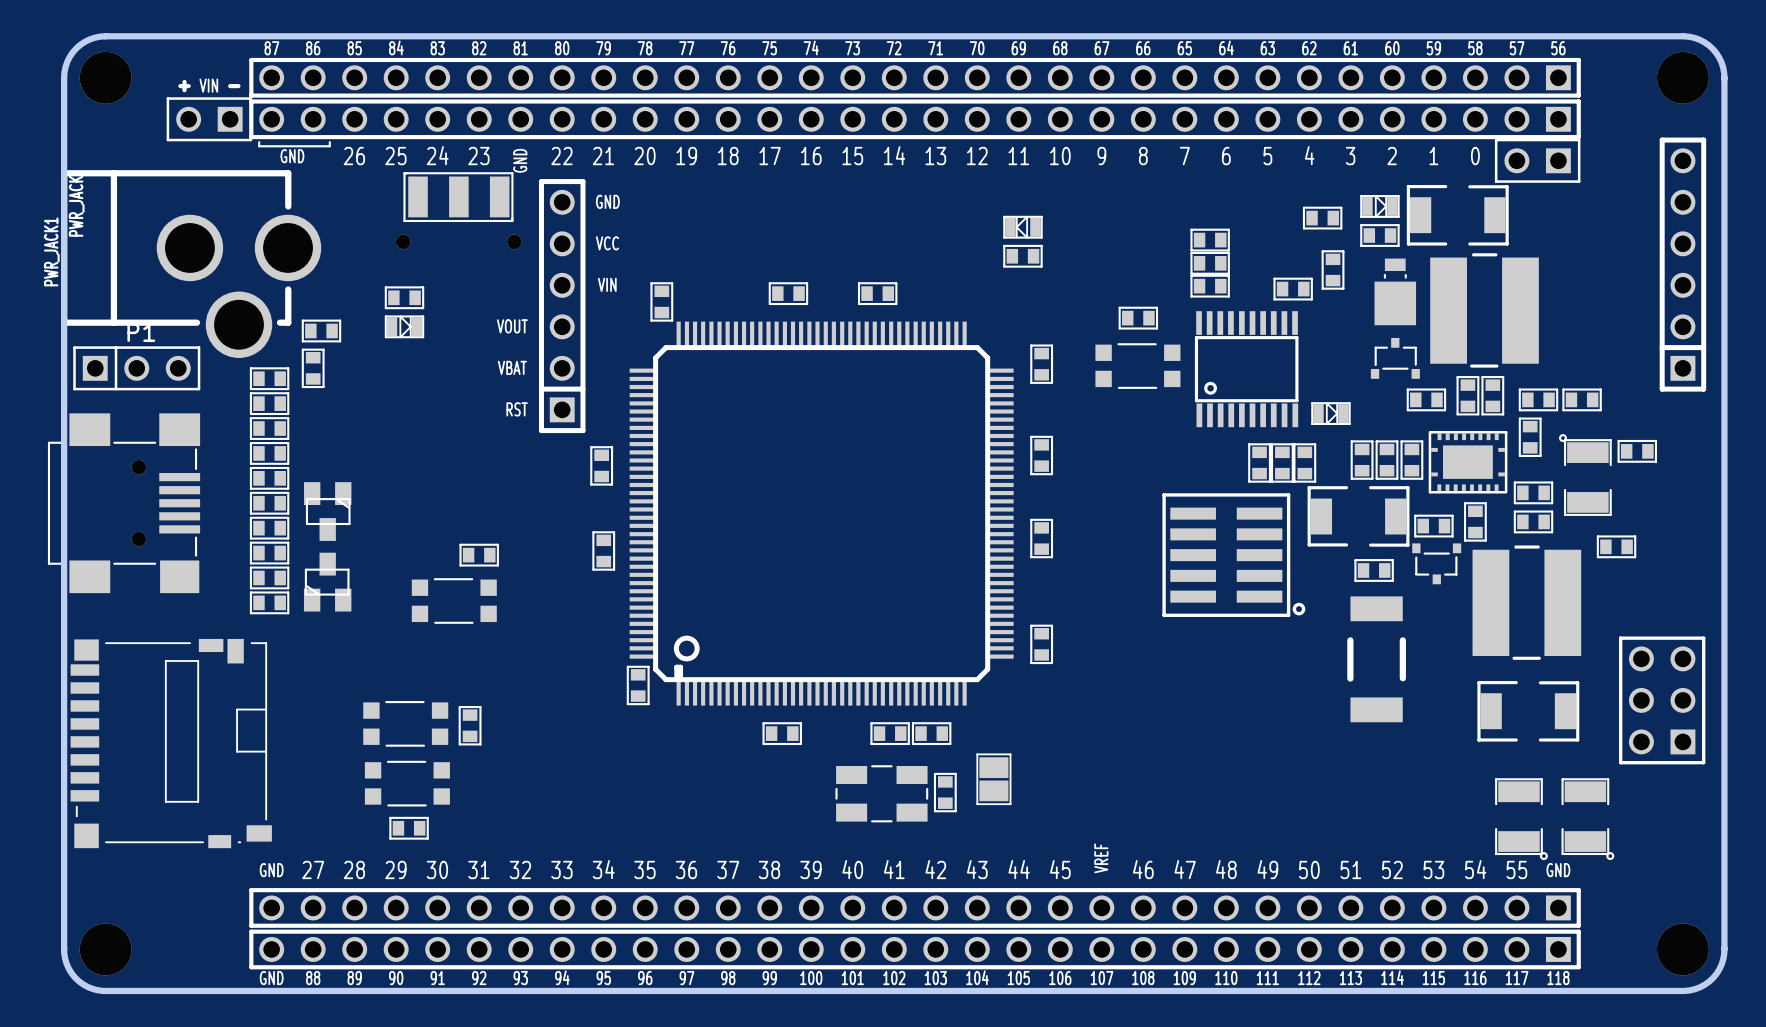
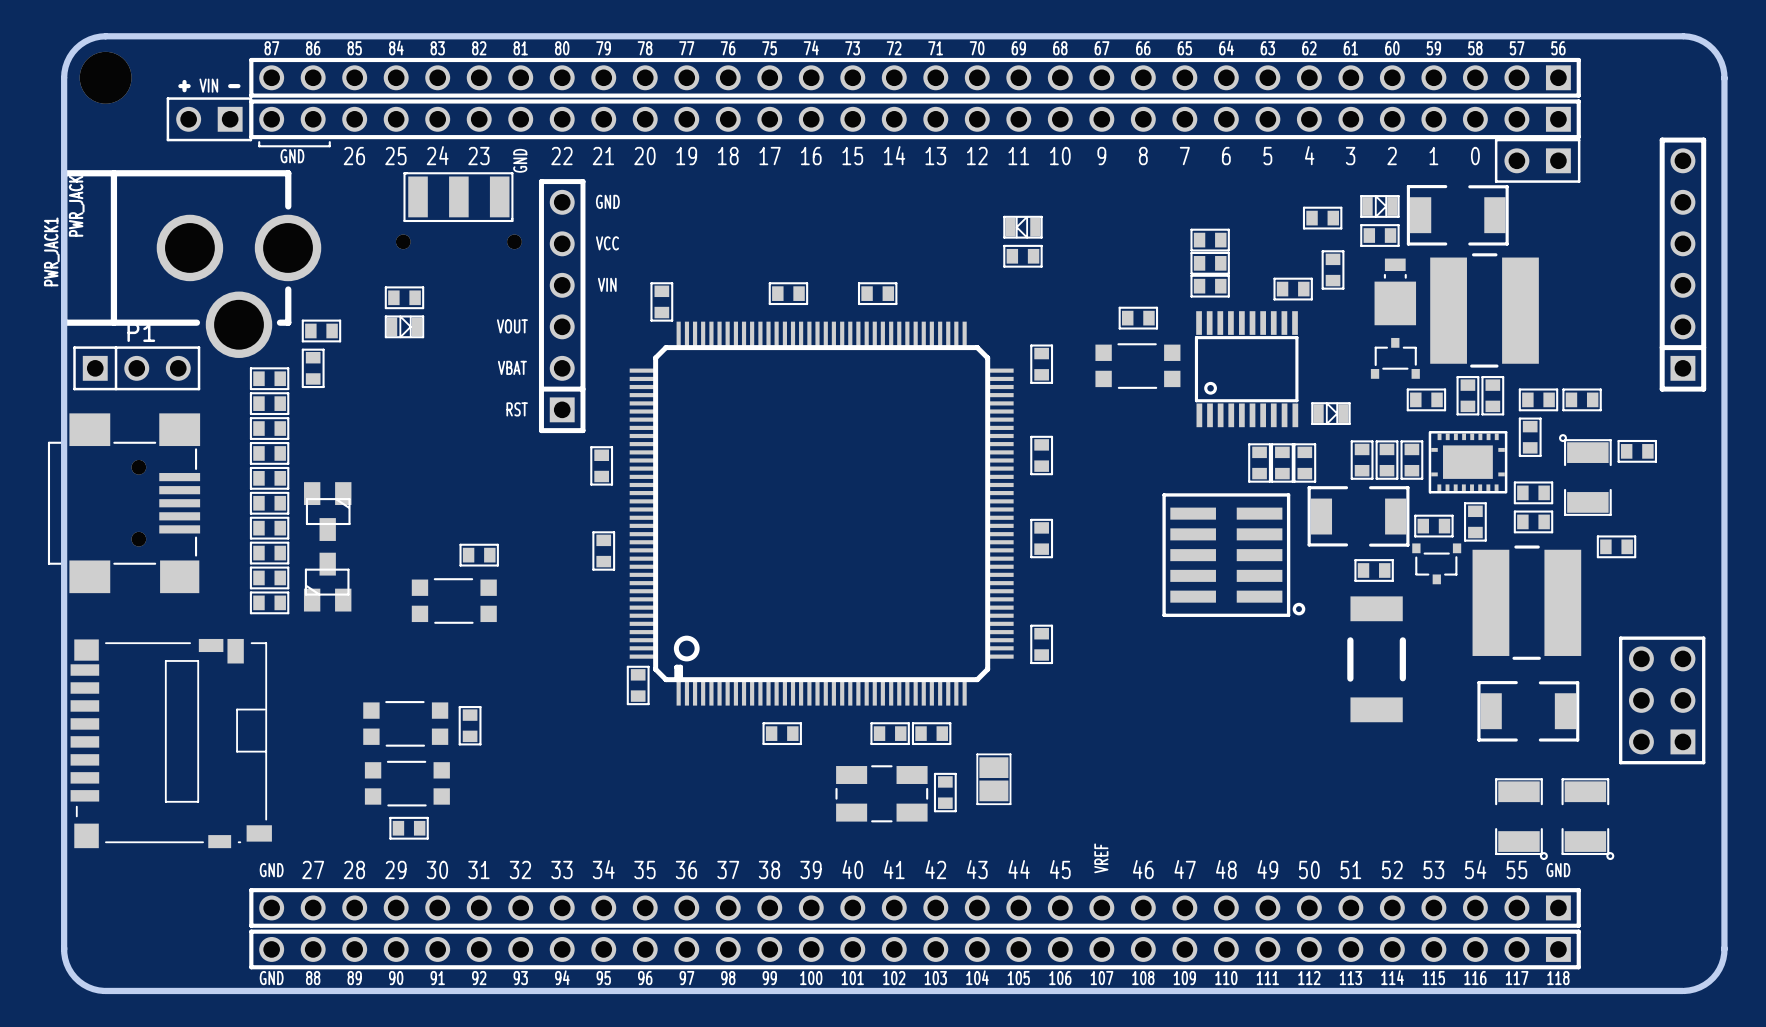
part: (1682, 77) -> none
part: (105, 949) -> none
part: (1682, 949) -> none

